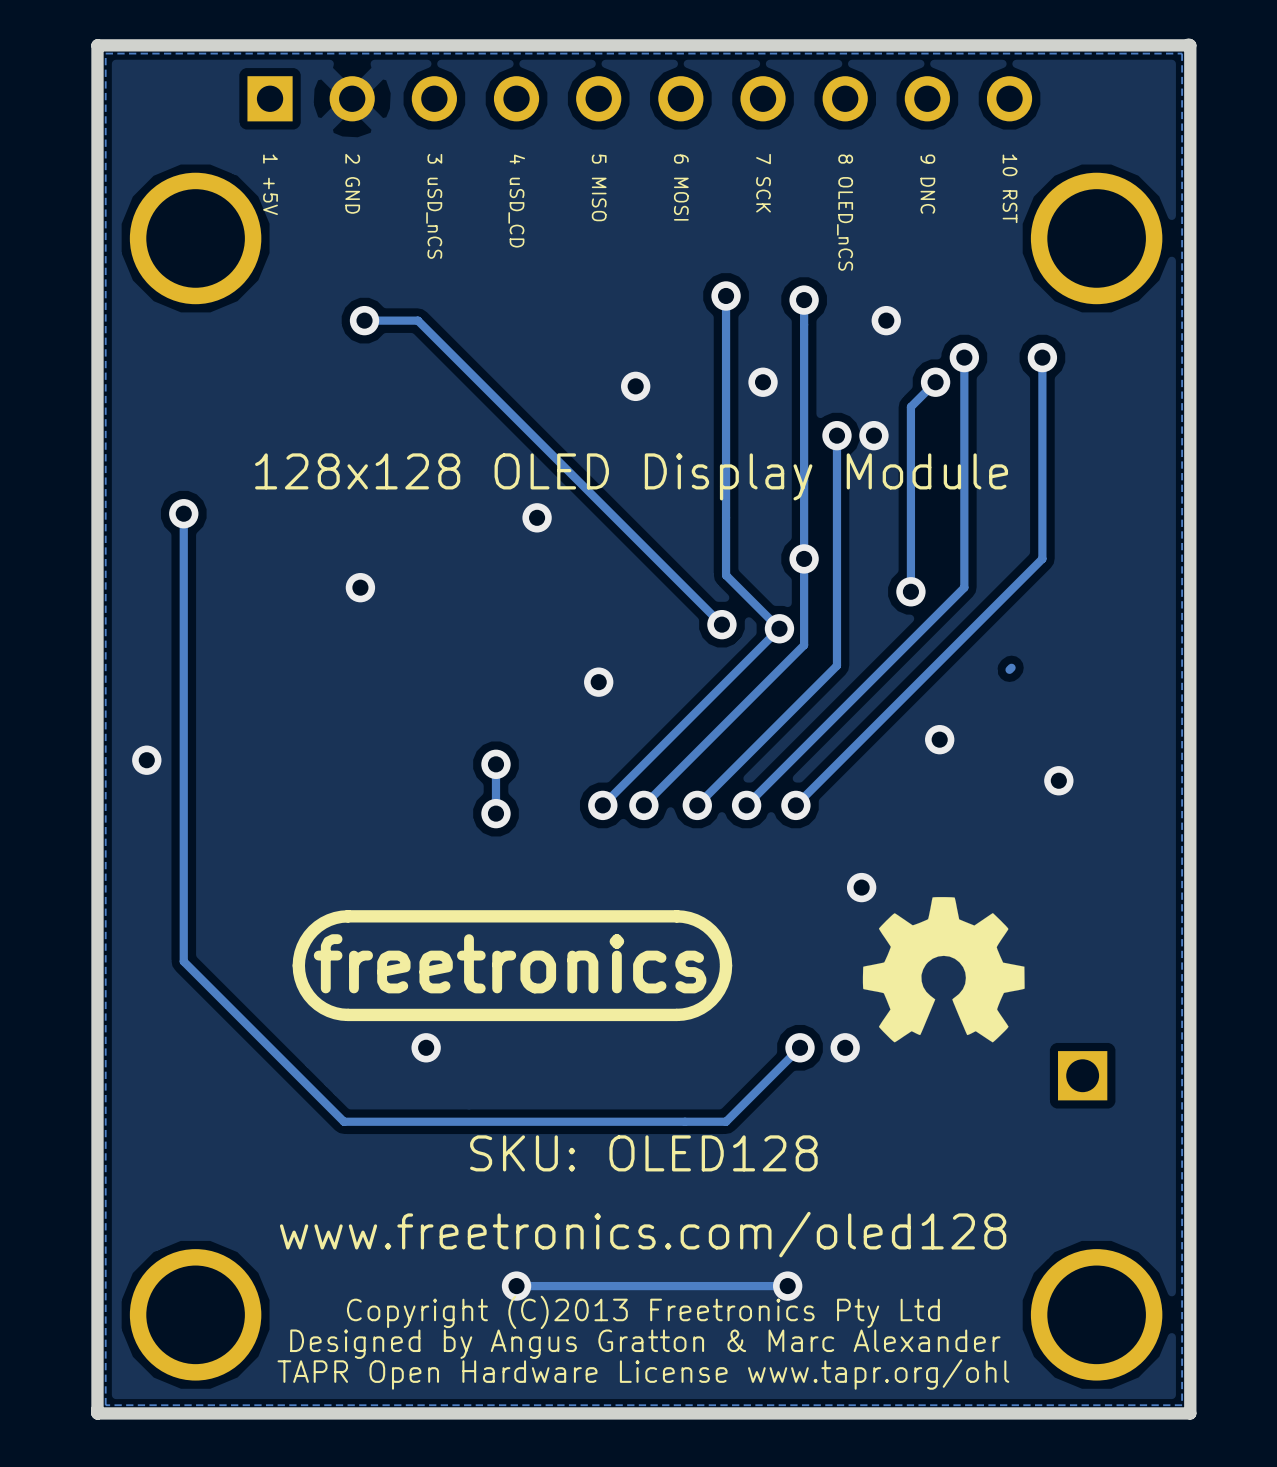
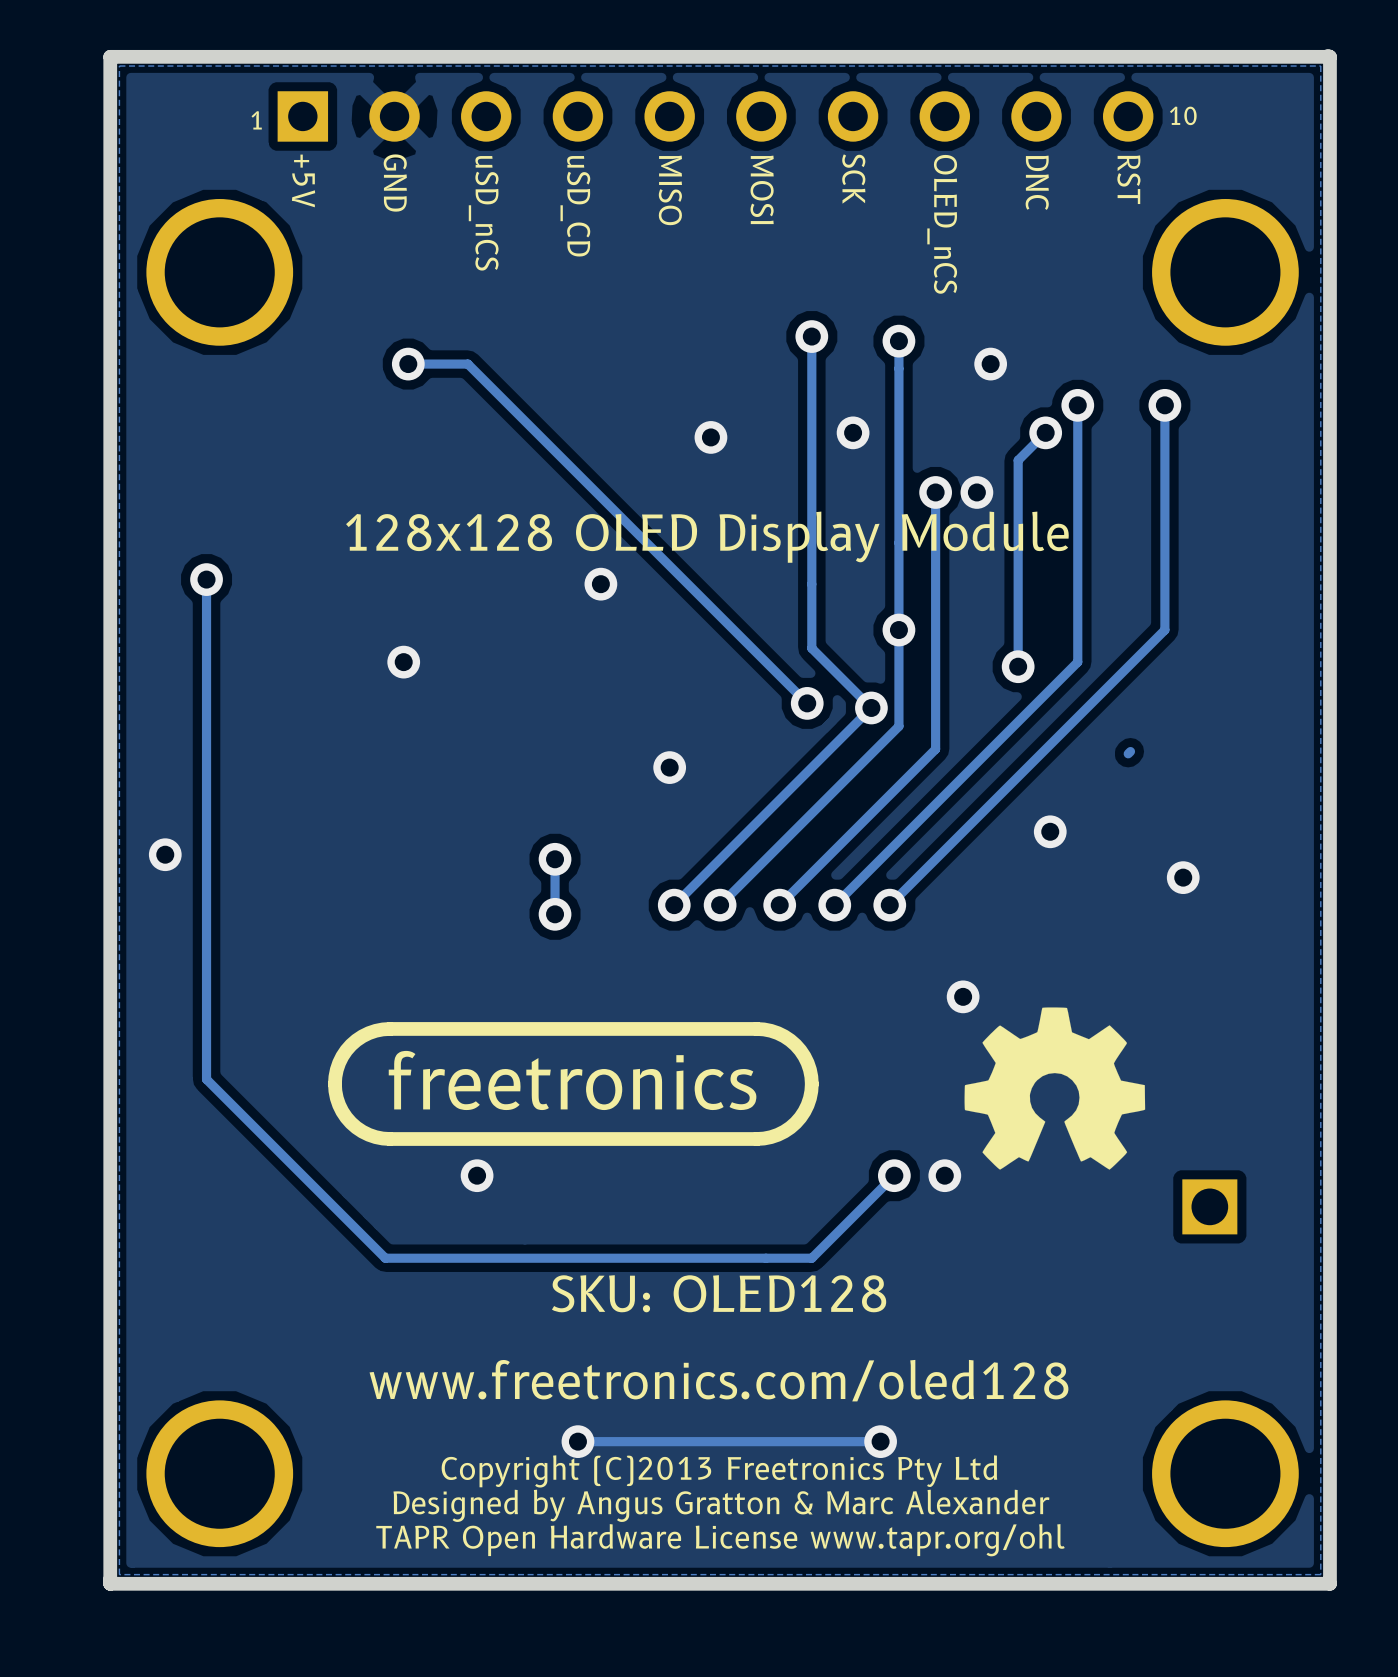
text: none -> 10 (1183, 115)
text: none -> 1 (256, 120)
text: 2 GND (352, 183) -> GND (395, 183)
text: 7 SCK (763, 183) -> SCK (853, 179)
text: 1 +5V (270, 184) -> +5V (303, 180)
text: 9 DNC (927, 184) -> DNC (1037, 182)
text: 5 MISO (599, 187) -> MISO (670, 190)
text: 6 MOSI (681, 187) -> MOSI (762, 189)
text: 10 RST (1010, 188) -> RST (1128, 179)
text: 4 uSD_CD (516, 201) -> uSD_CD (575, 206)
text: 3 uSD_nCS (434, 206) -> uSD_nCS (483, 213)
text: 8 OLED_nCS (845, 212) -> OLED_nCS (942, 224)

